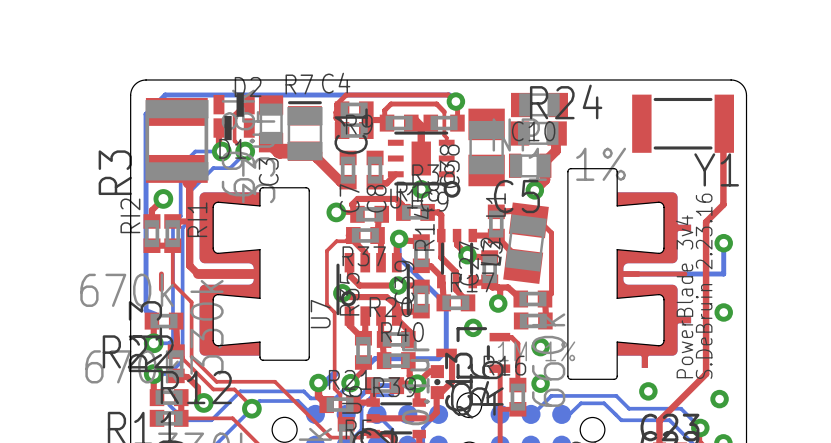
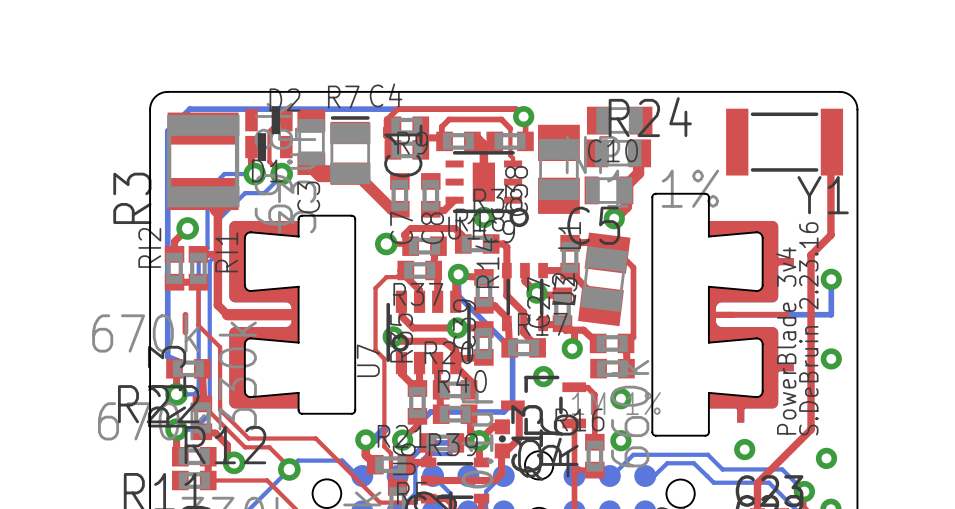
bottom track: (350, 383) (335, 398) (310, 398) (303, 391) (240, 391) (211, 420) (184, 420) (169, 404) -> none

